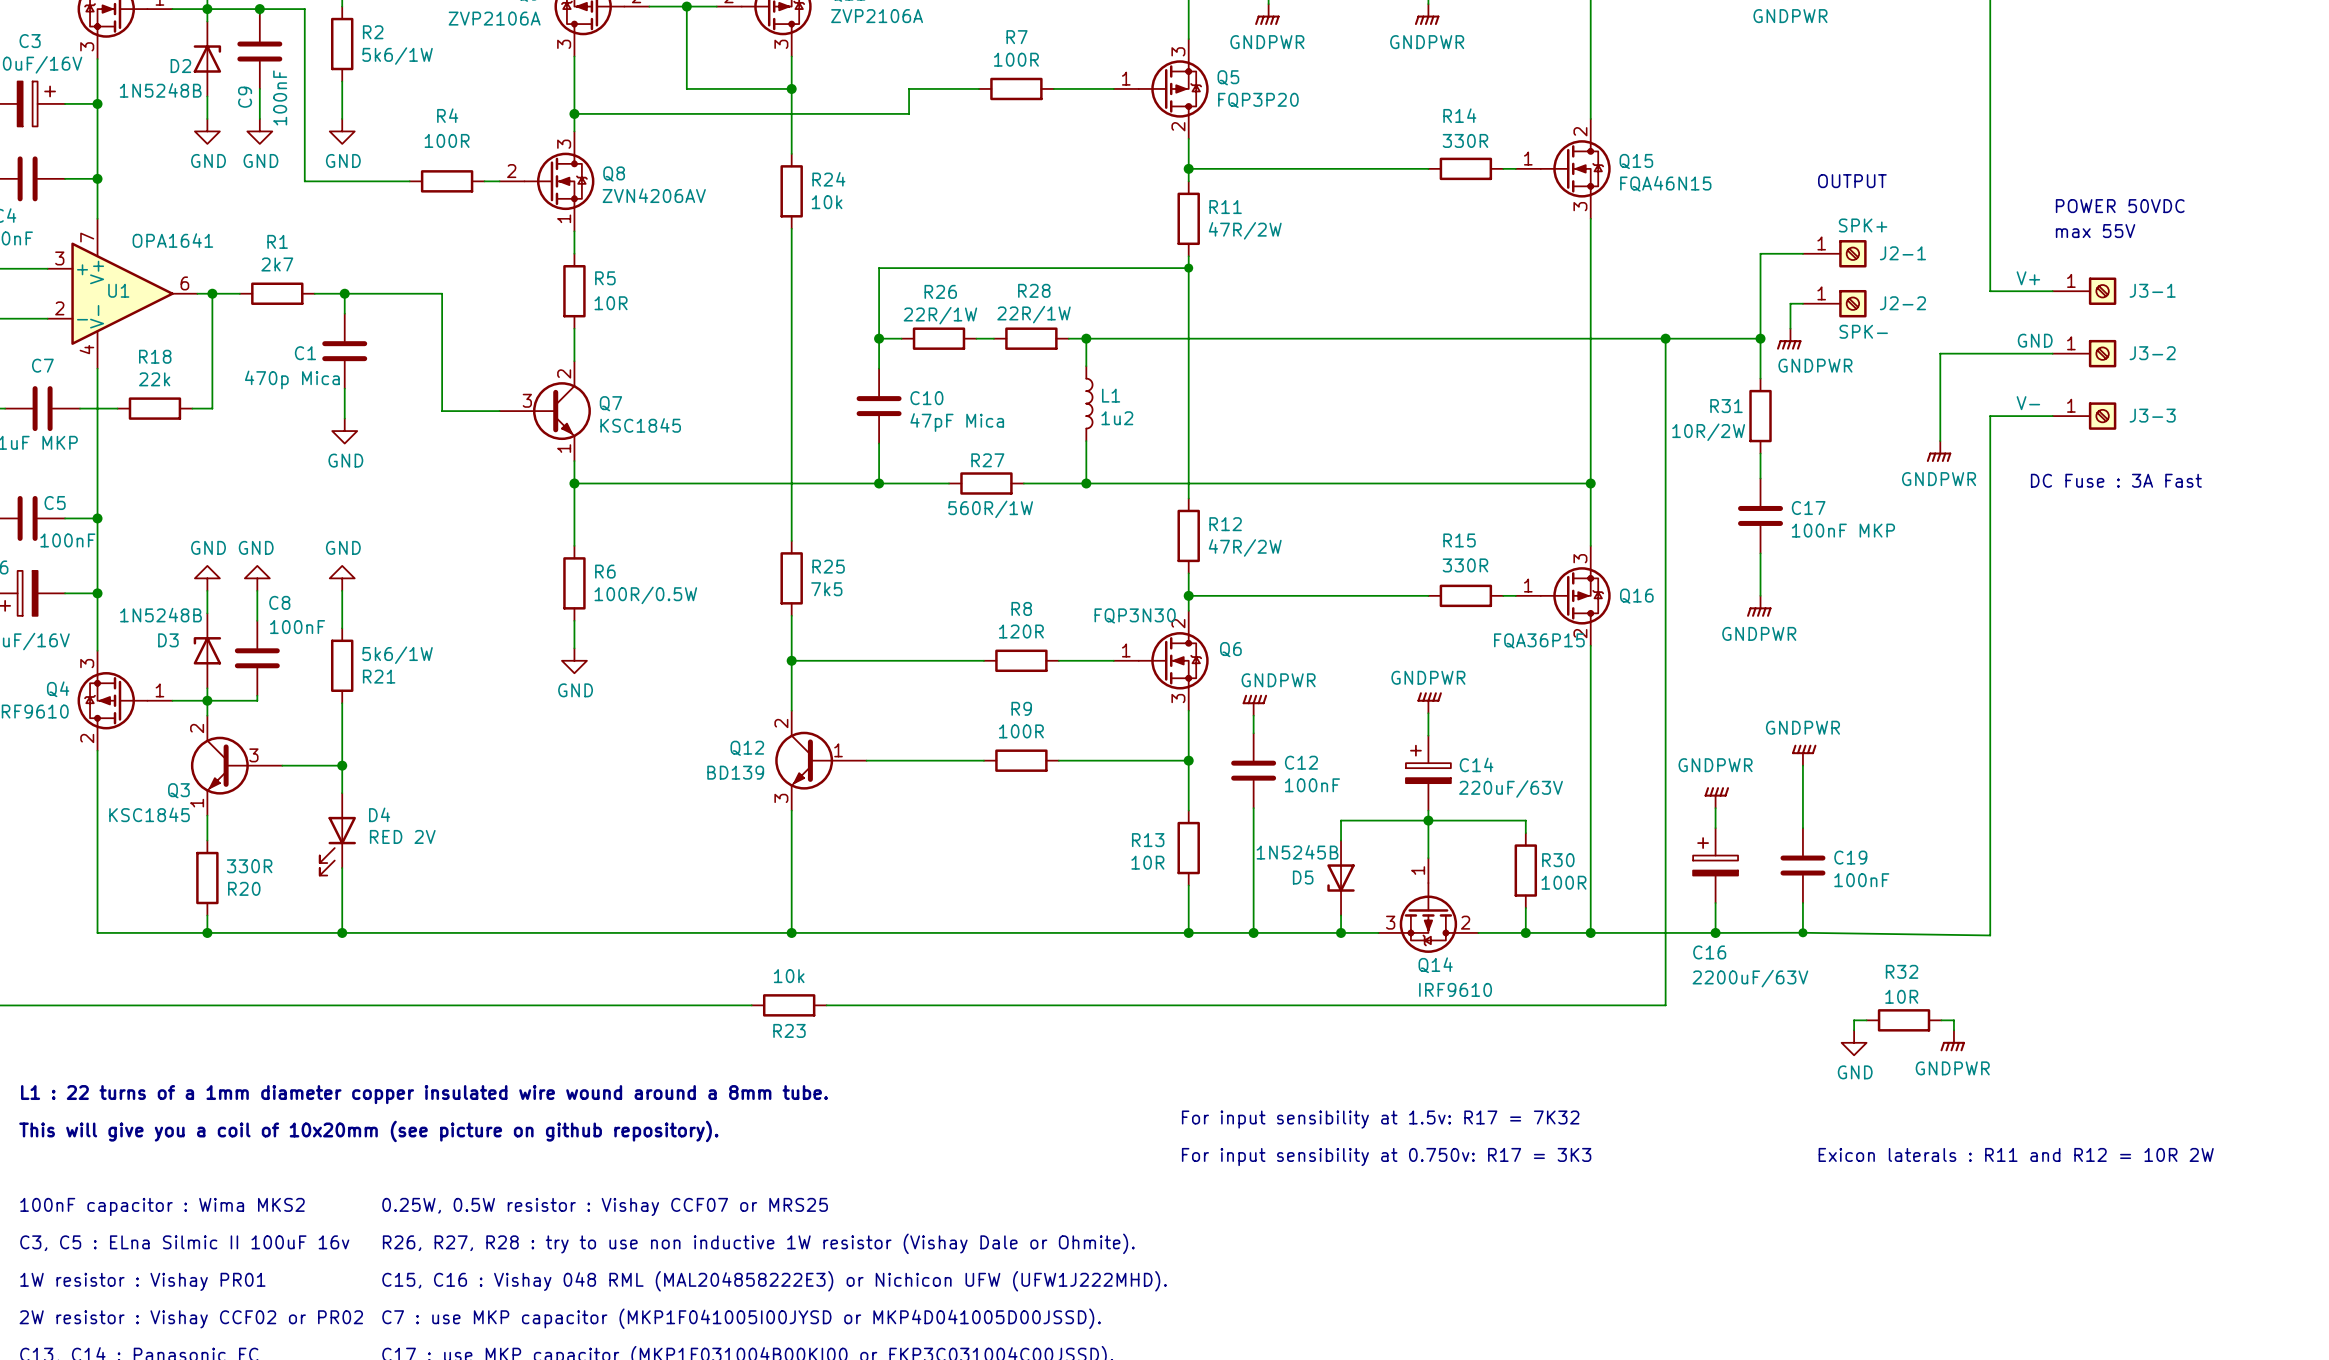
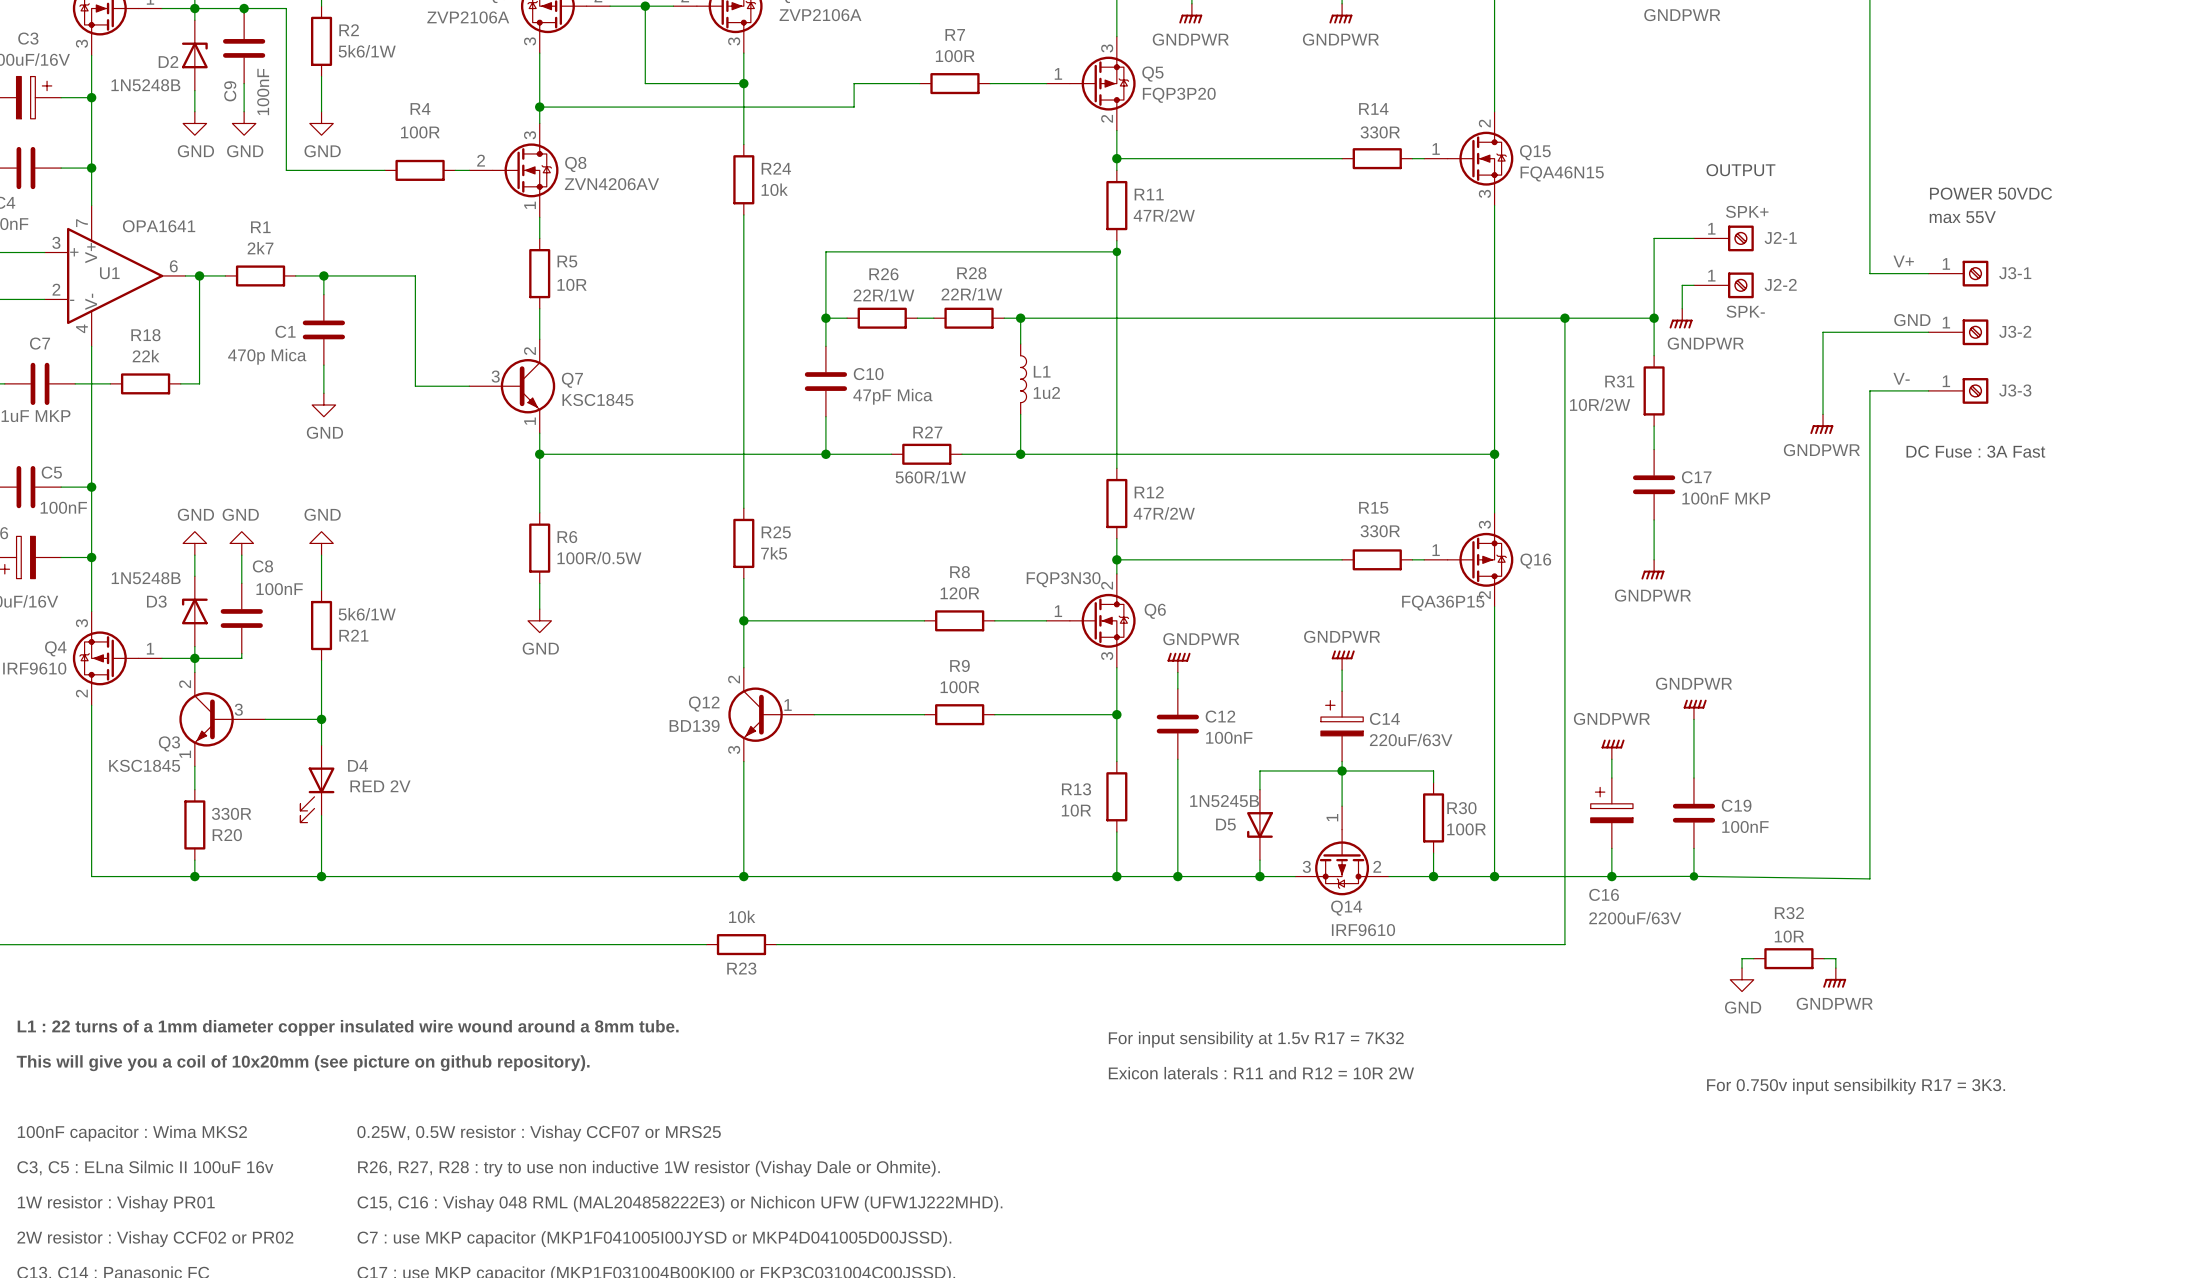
text: For input sensibility at 1.5v: R17 = 7K32 (1380, 1119) -> For input sensibility at 1.5v R17 = 7K32 (1256, 1039)
text: none -> Exicon laterals : R11 and R12 = 10R 2W (1261, 1073)
text: Exicon laterals : R11 and R12 = 10R 2W (2016, 1154) -> For 0.750v input sensibilkity R17 = 3K3. (1856, 1086)
text: For input sensibility at 0.750v: R17 = 3K3 (1386, 1157) -> none

